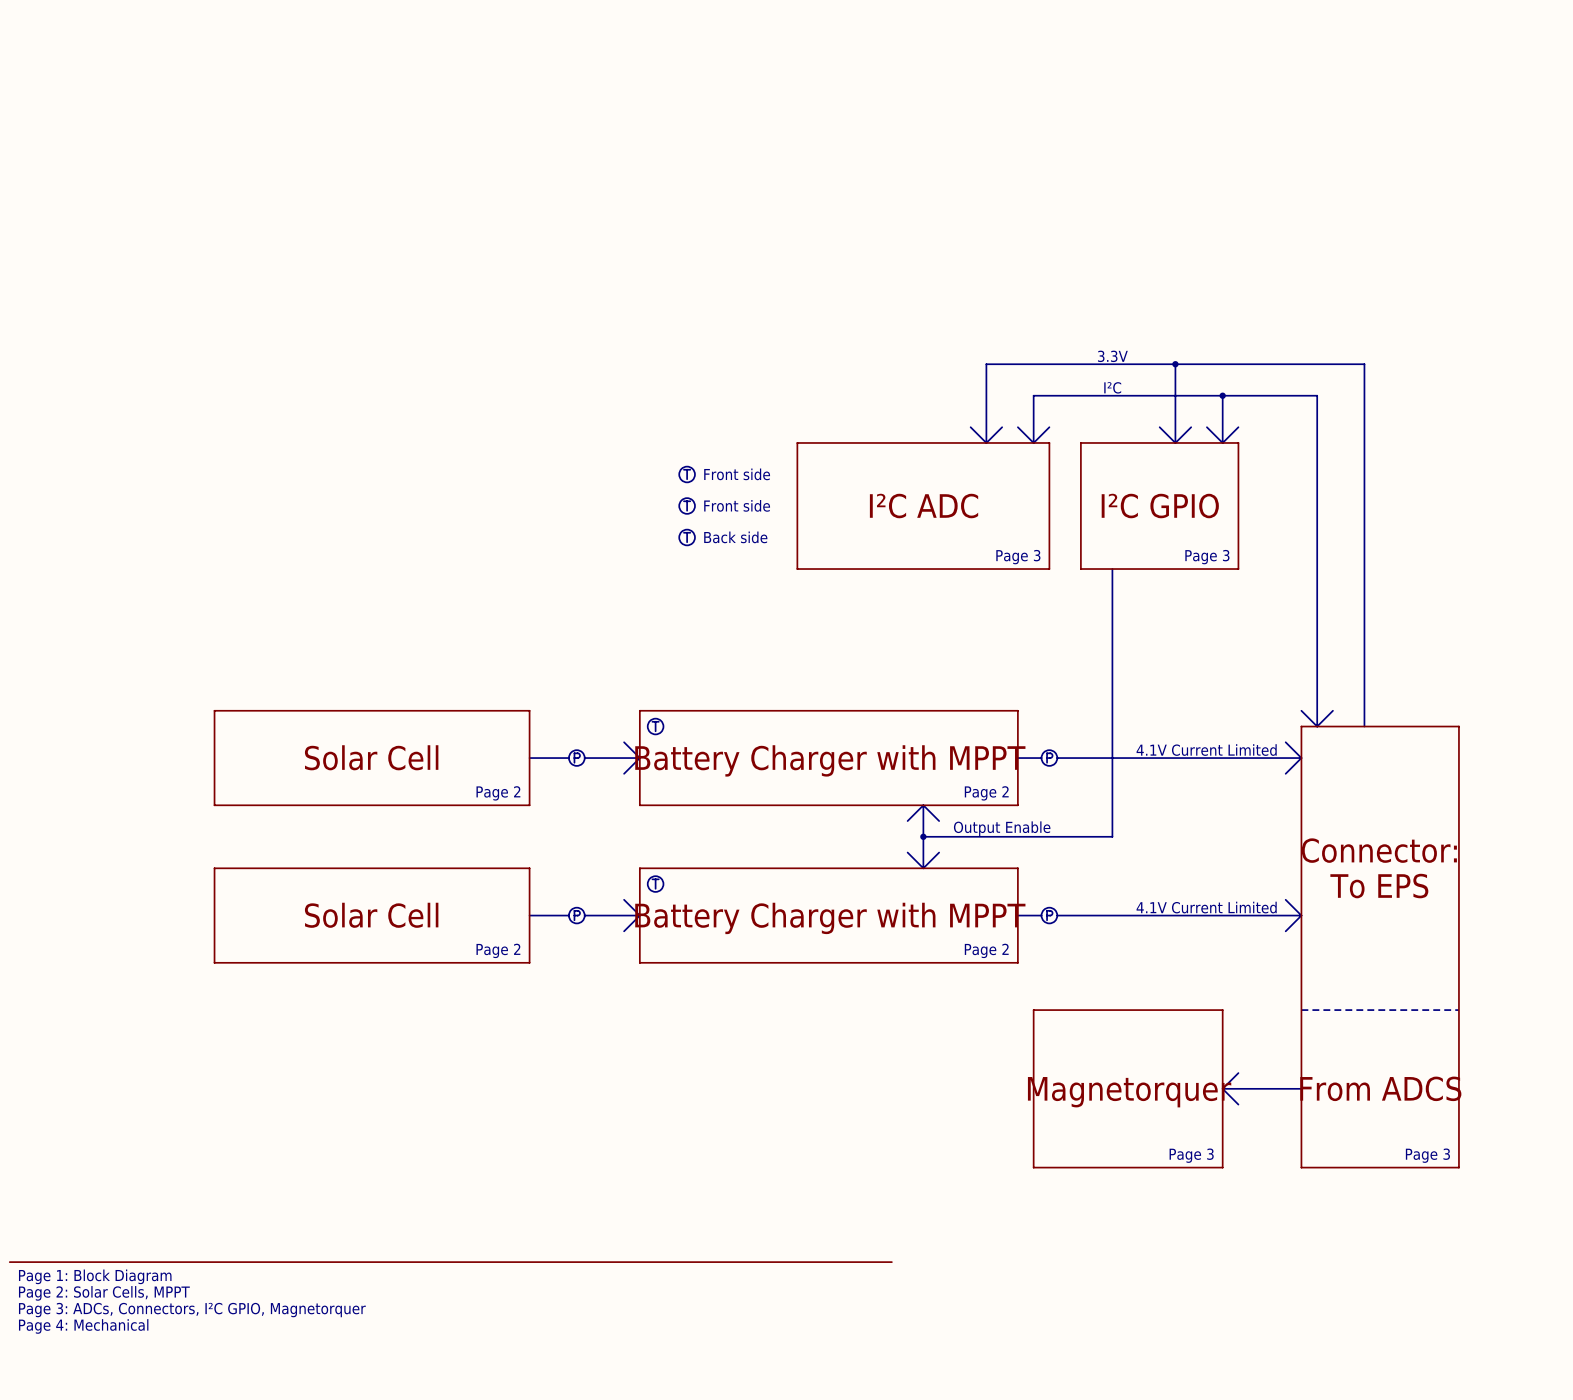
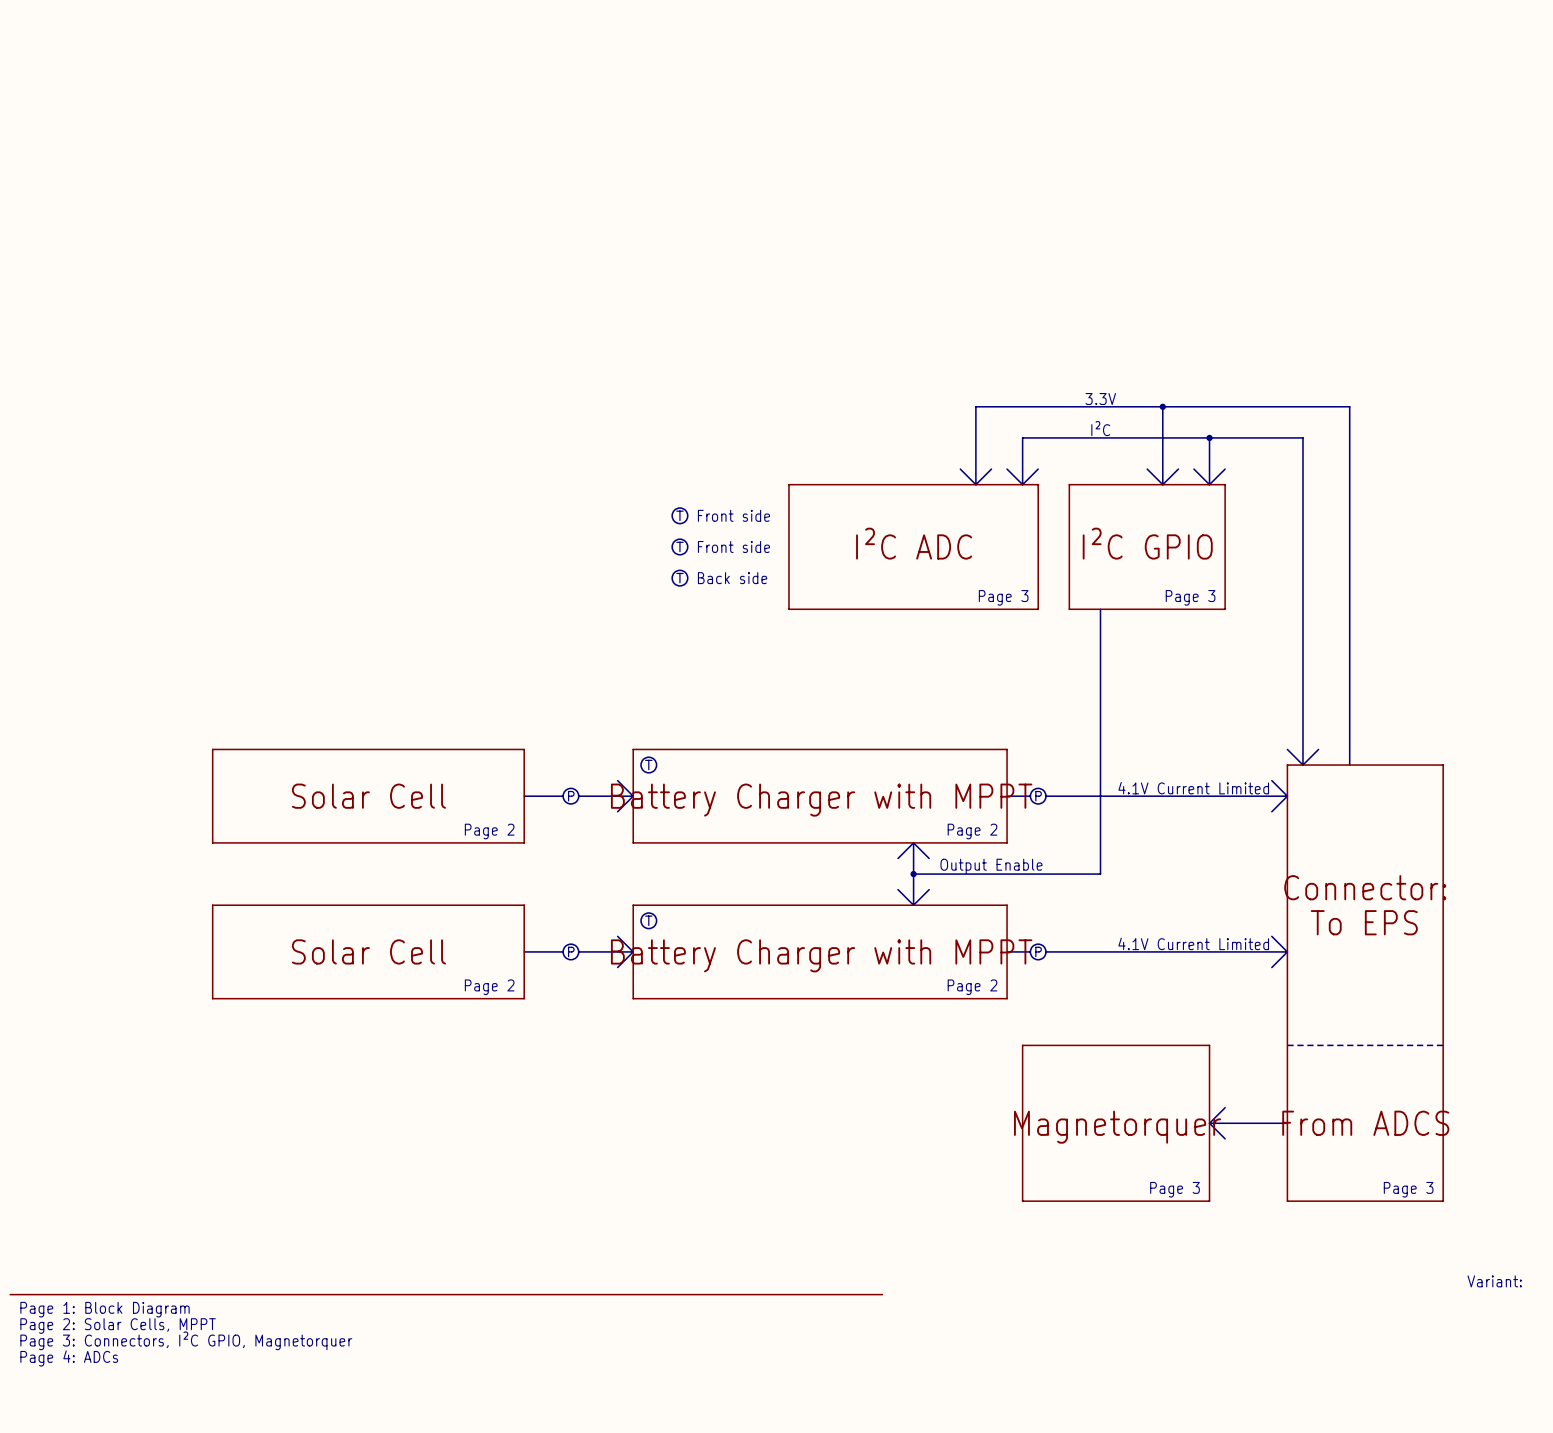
text: none -> Variant: (1494, 1281)
text: Page 3: ADCs, Connectors, I²C GPIO, Magnetorquer (192, 1310) -> Page 3: Connectors, I²C GPIO, Magnetorquer (186, 1340)
text: Page 4: Mechanical (83, 1326) -> Page 4: ADCs (69, 1358)

